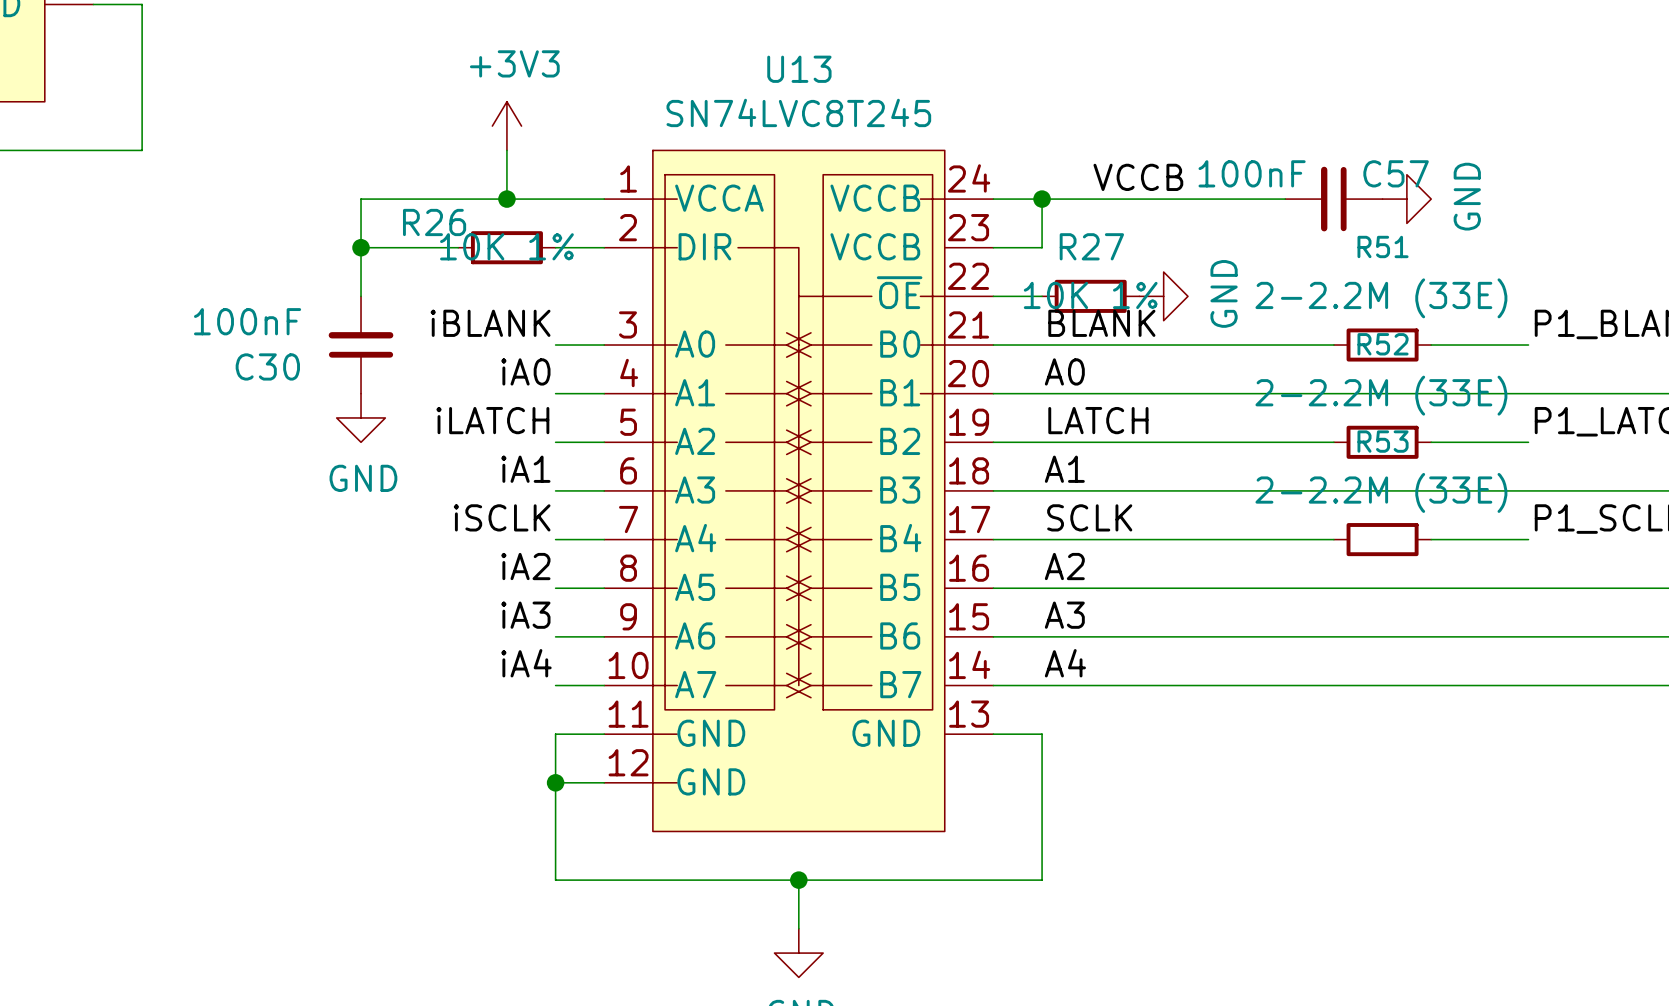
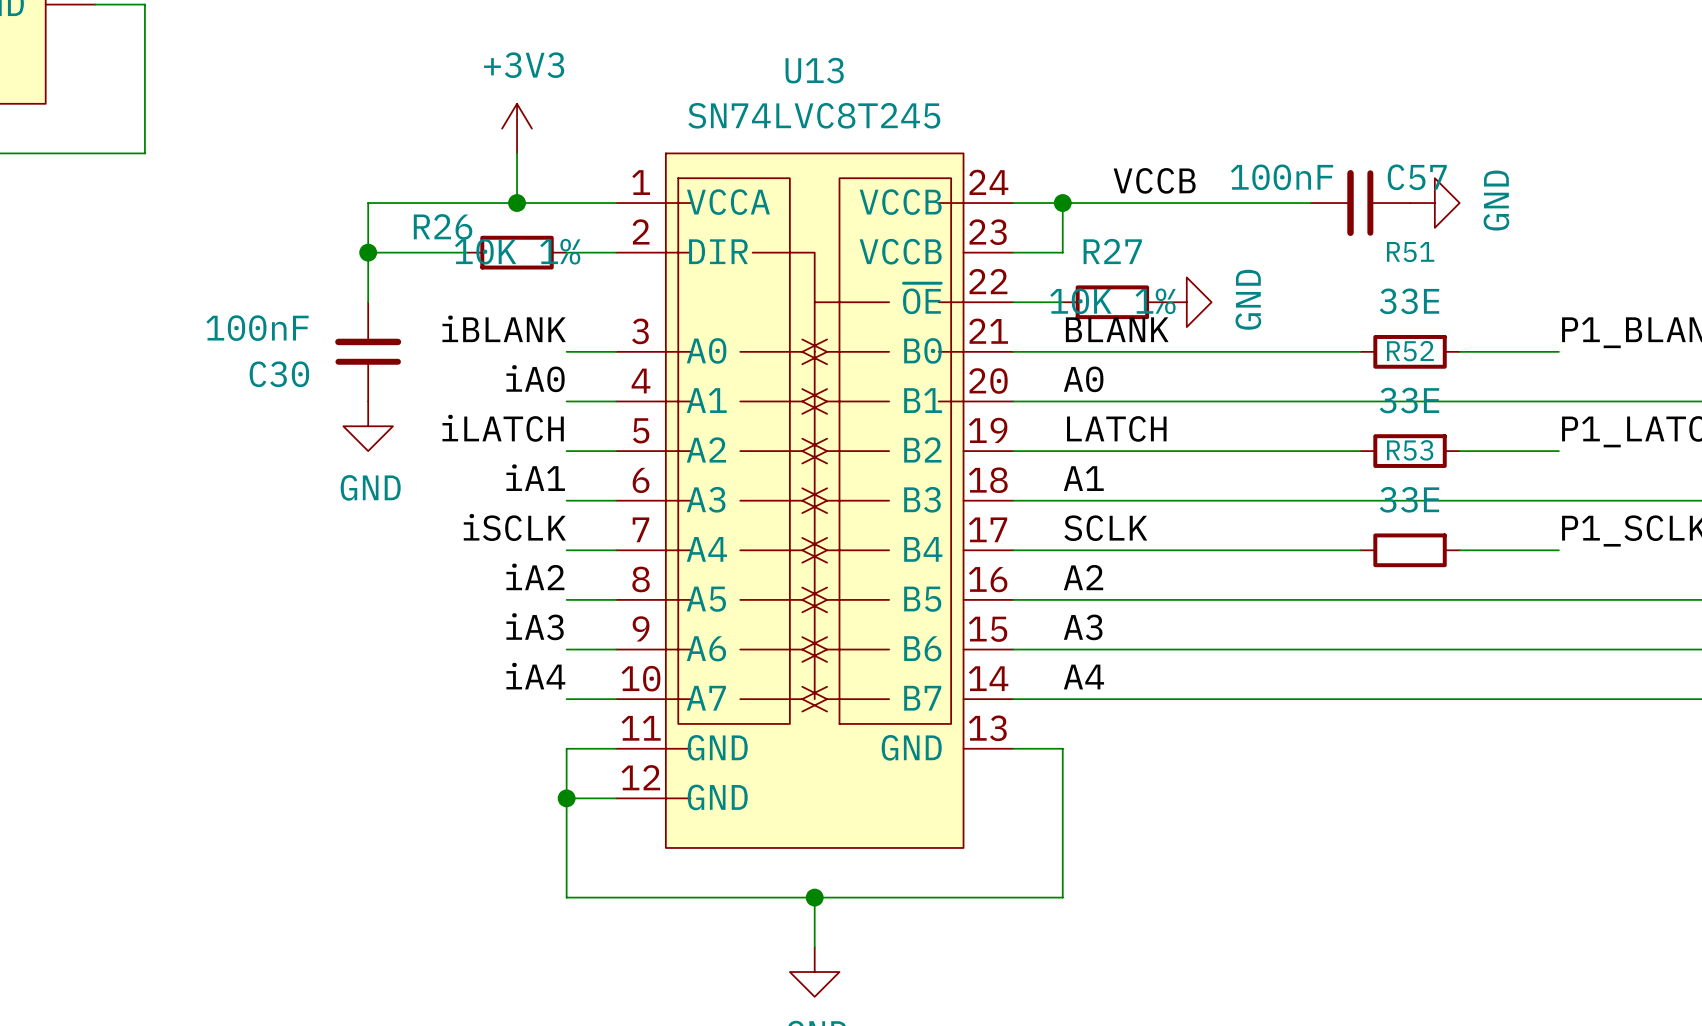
R51 value: 2-2.2M (33E) (1381, 298) -> 33E (1409, 301)
R52 value: 2-2.2M (33E) (1381, 395) -> 33E (1409, 400)
R53 value: 2-2.2M (33E) (1381, 492) -> 33E (1409, 499)

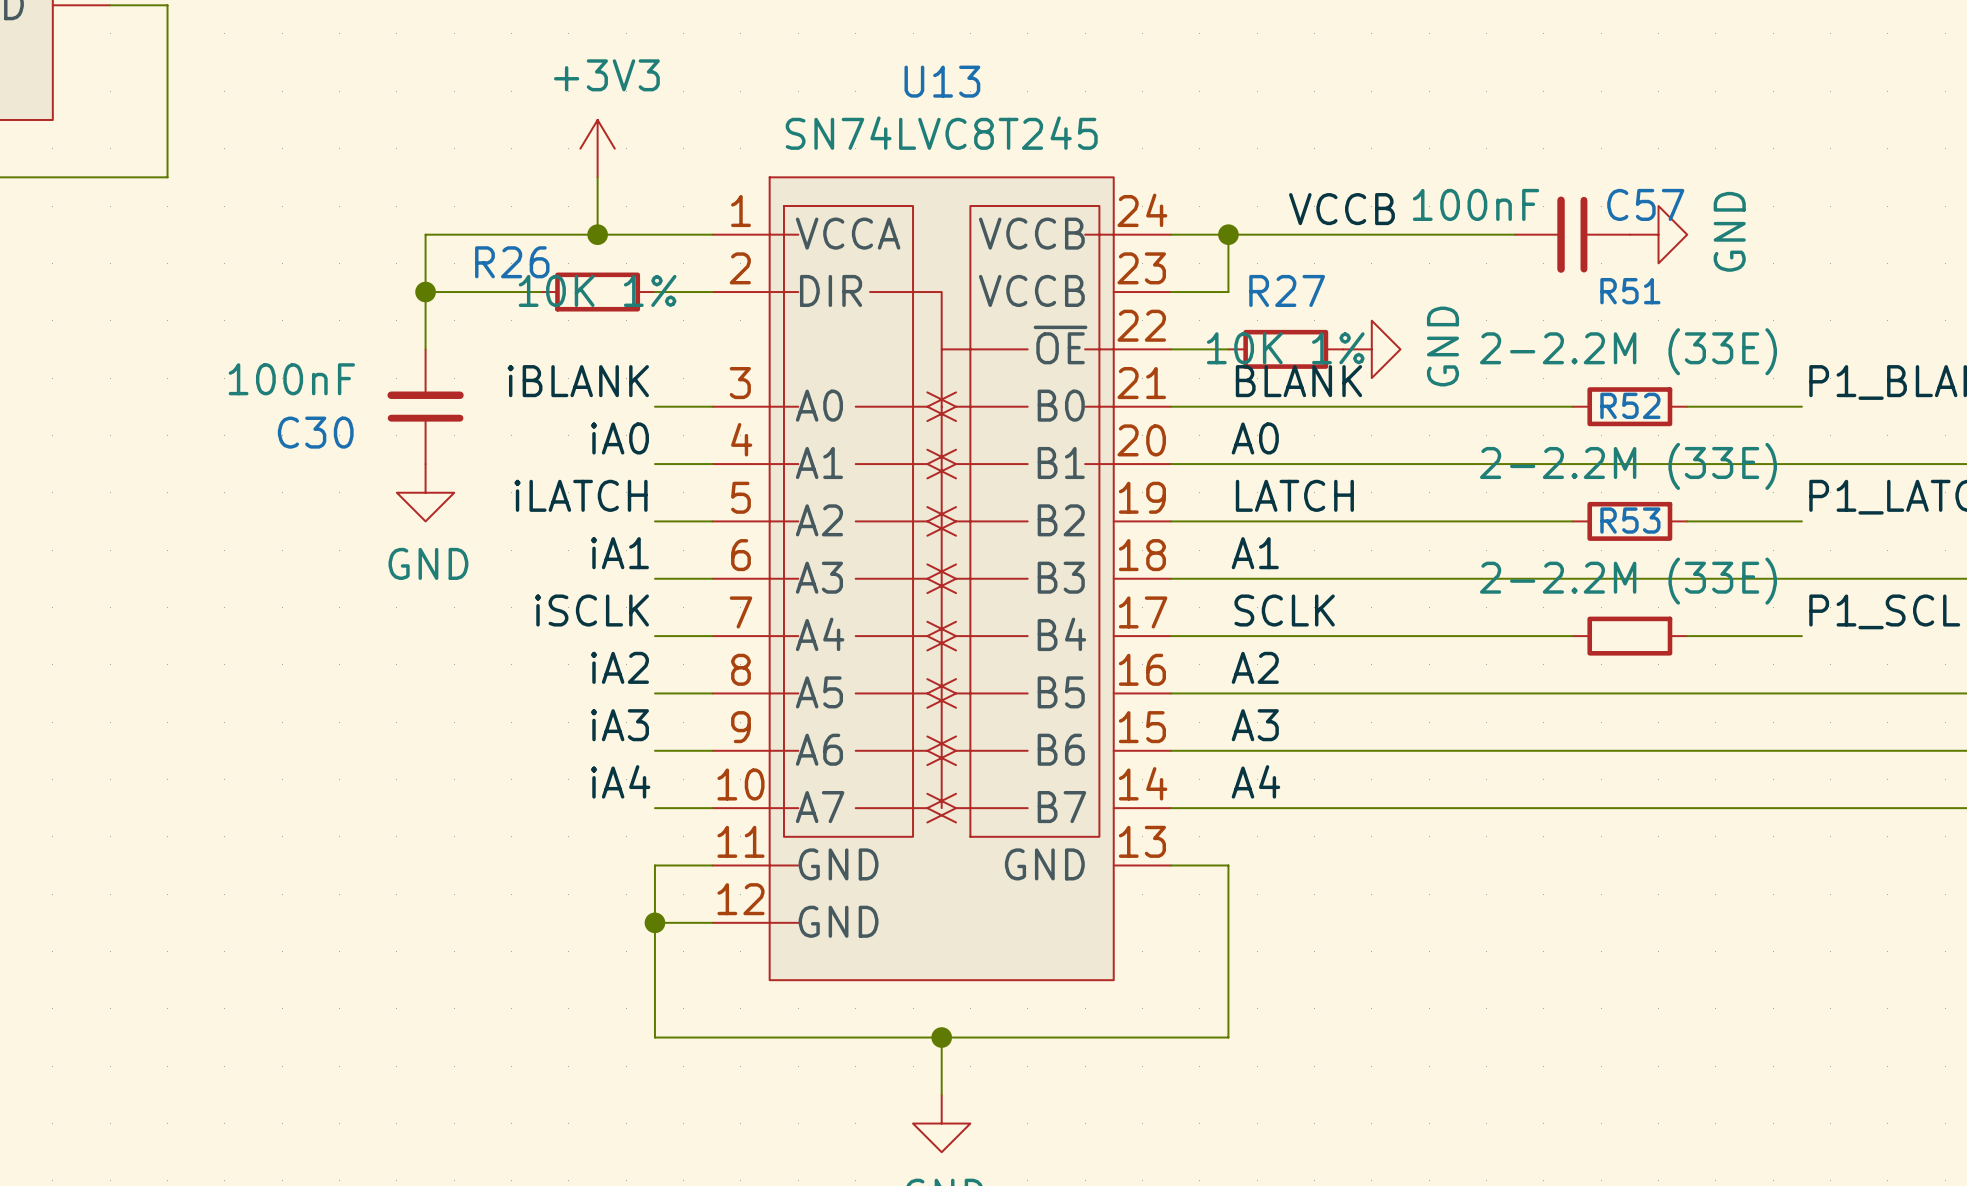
R51 value: 33E (1409, 301) -> 2-2.2M (33E) (1628, 351)
R52 value: 33E (1409, 400) -> 2-2.2M (33E) (1628, 466)
R53 value: 33E (1409, 499) -> 2-2.2M (33E) (1628, 581)

